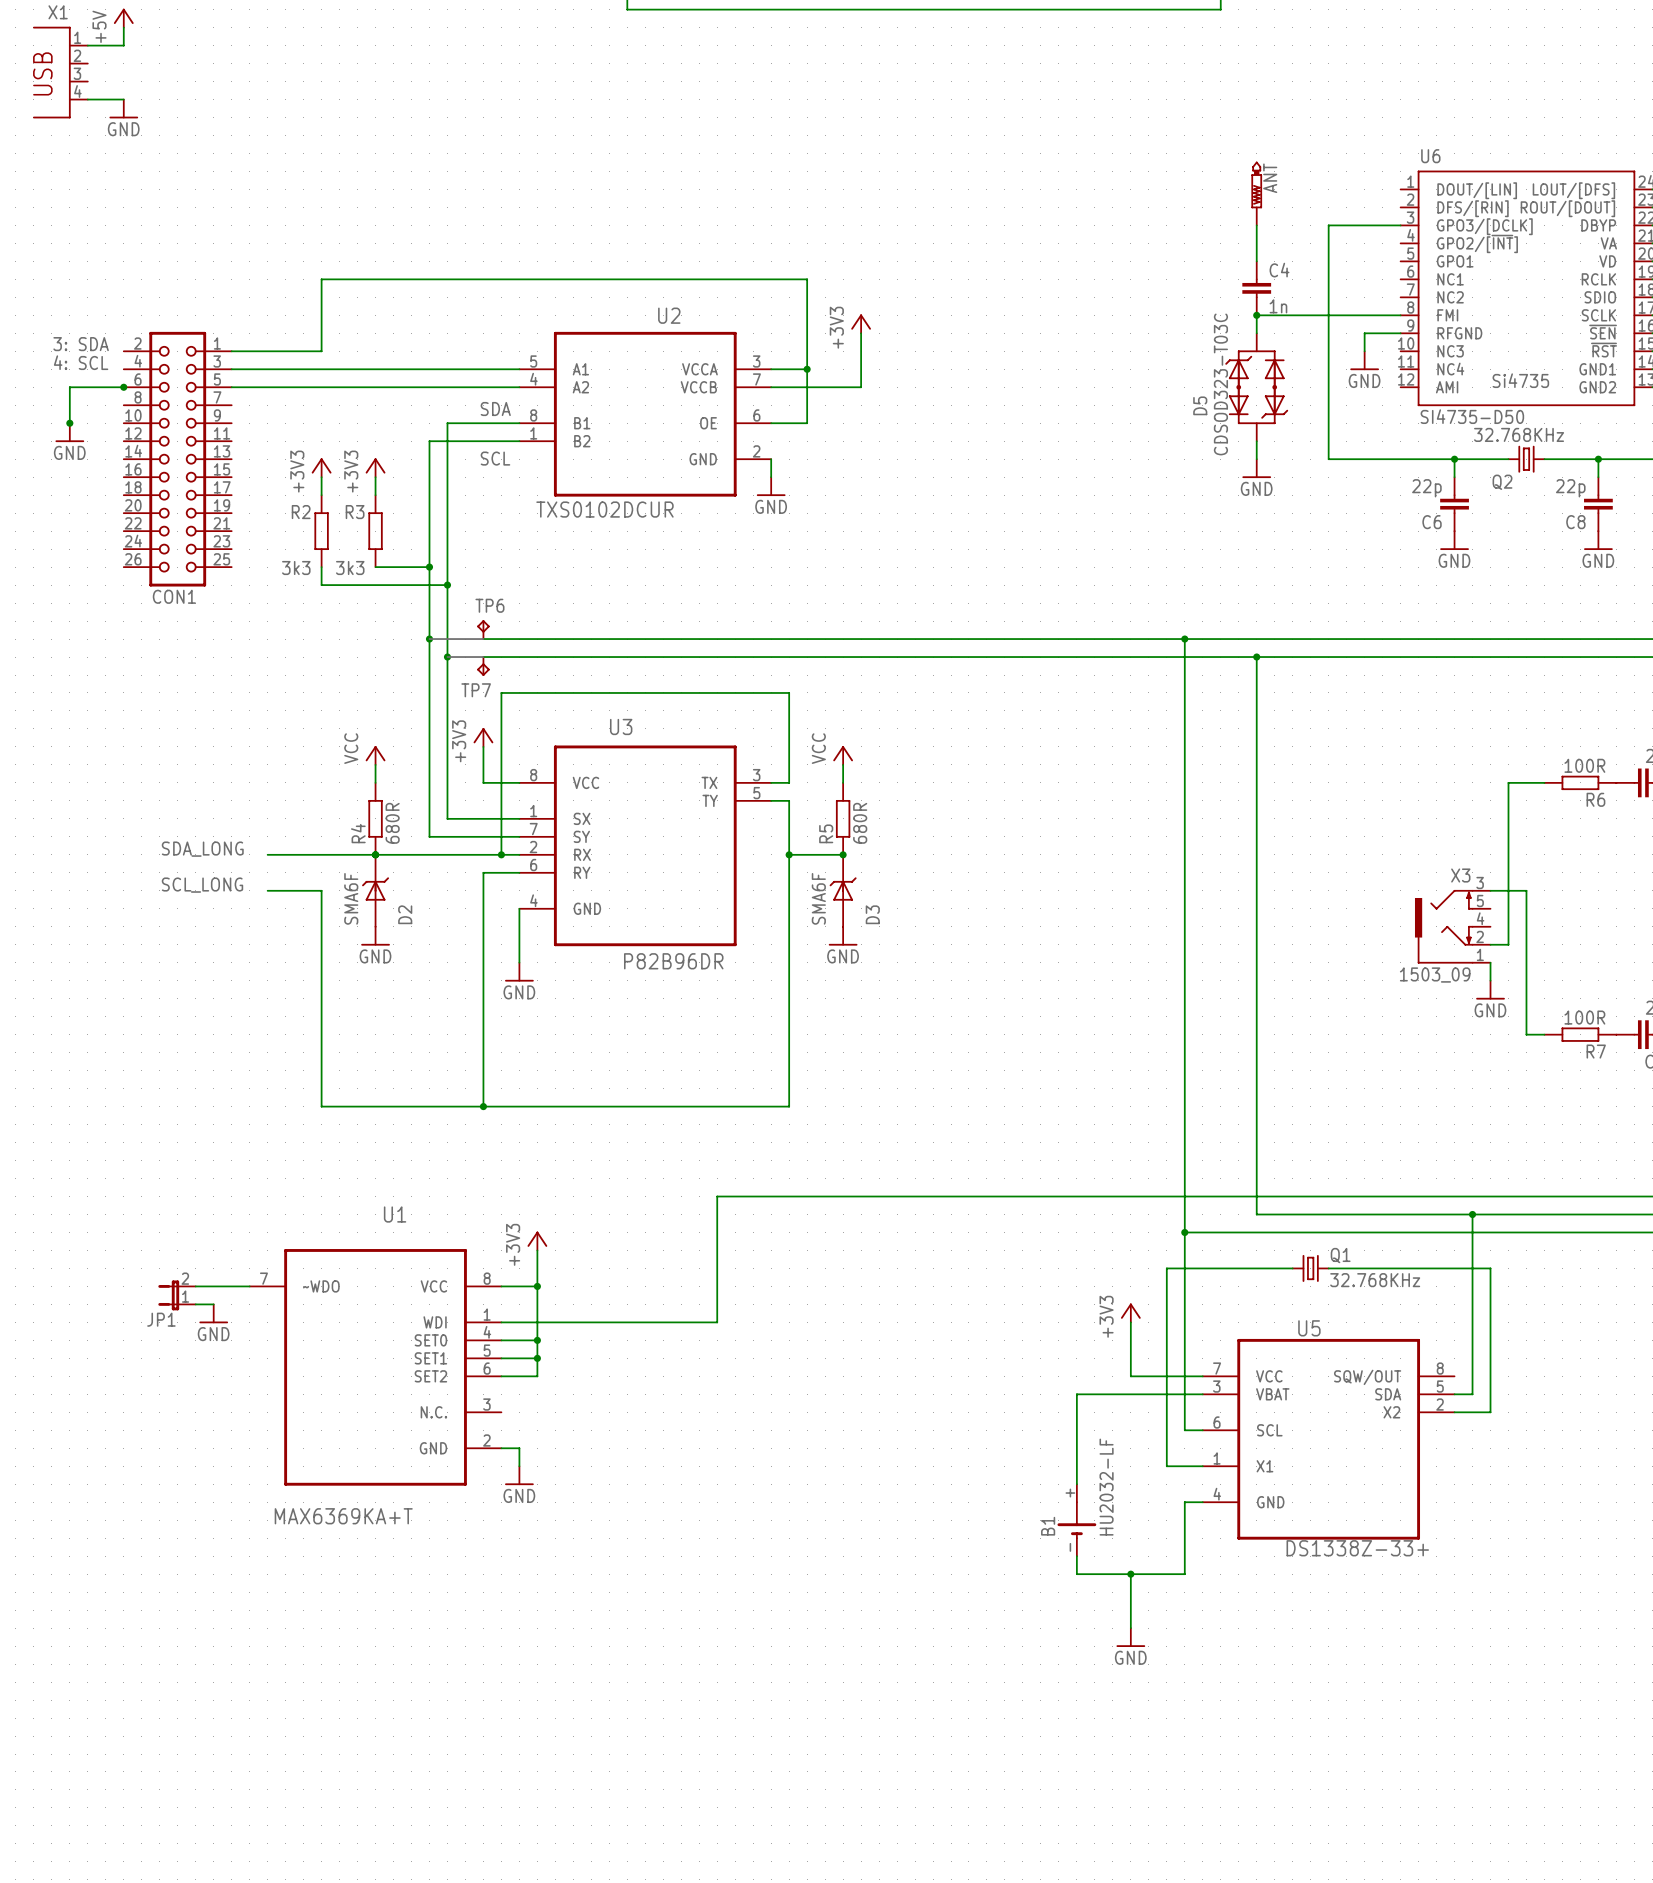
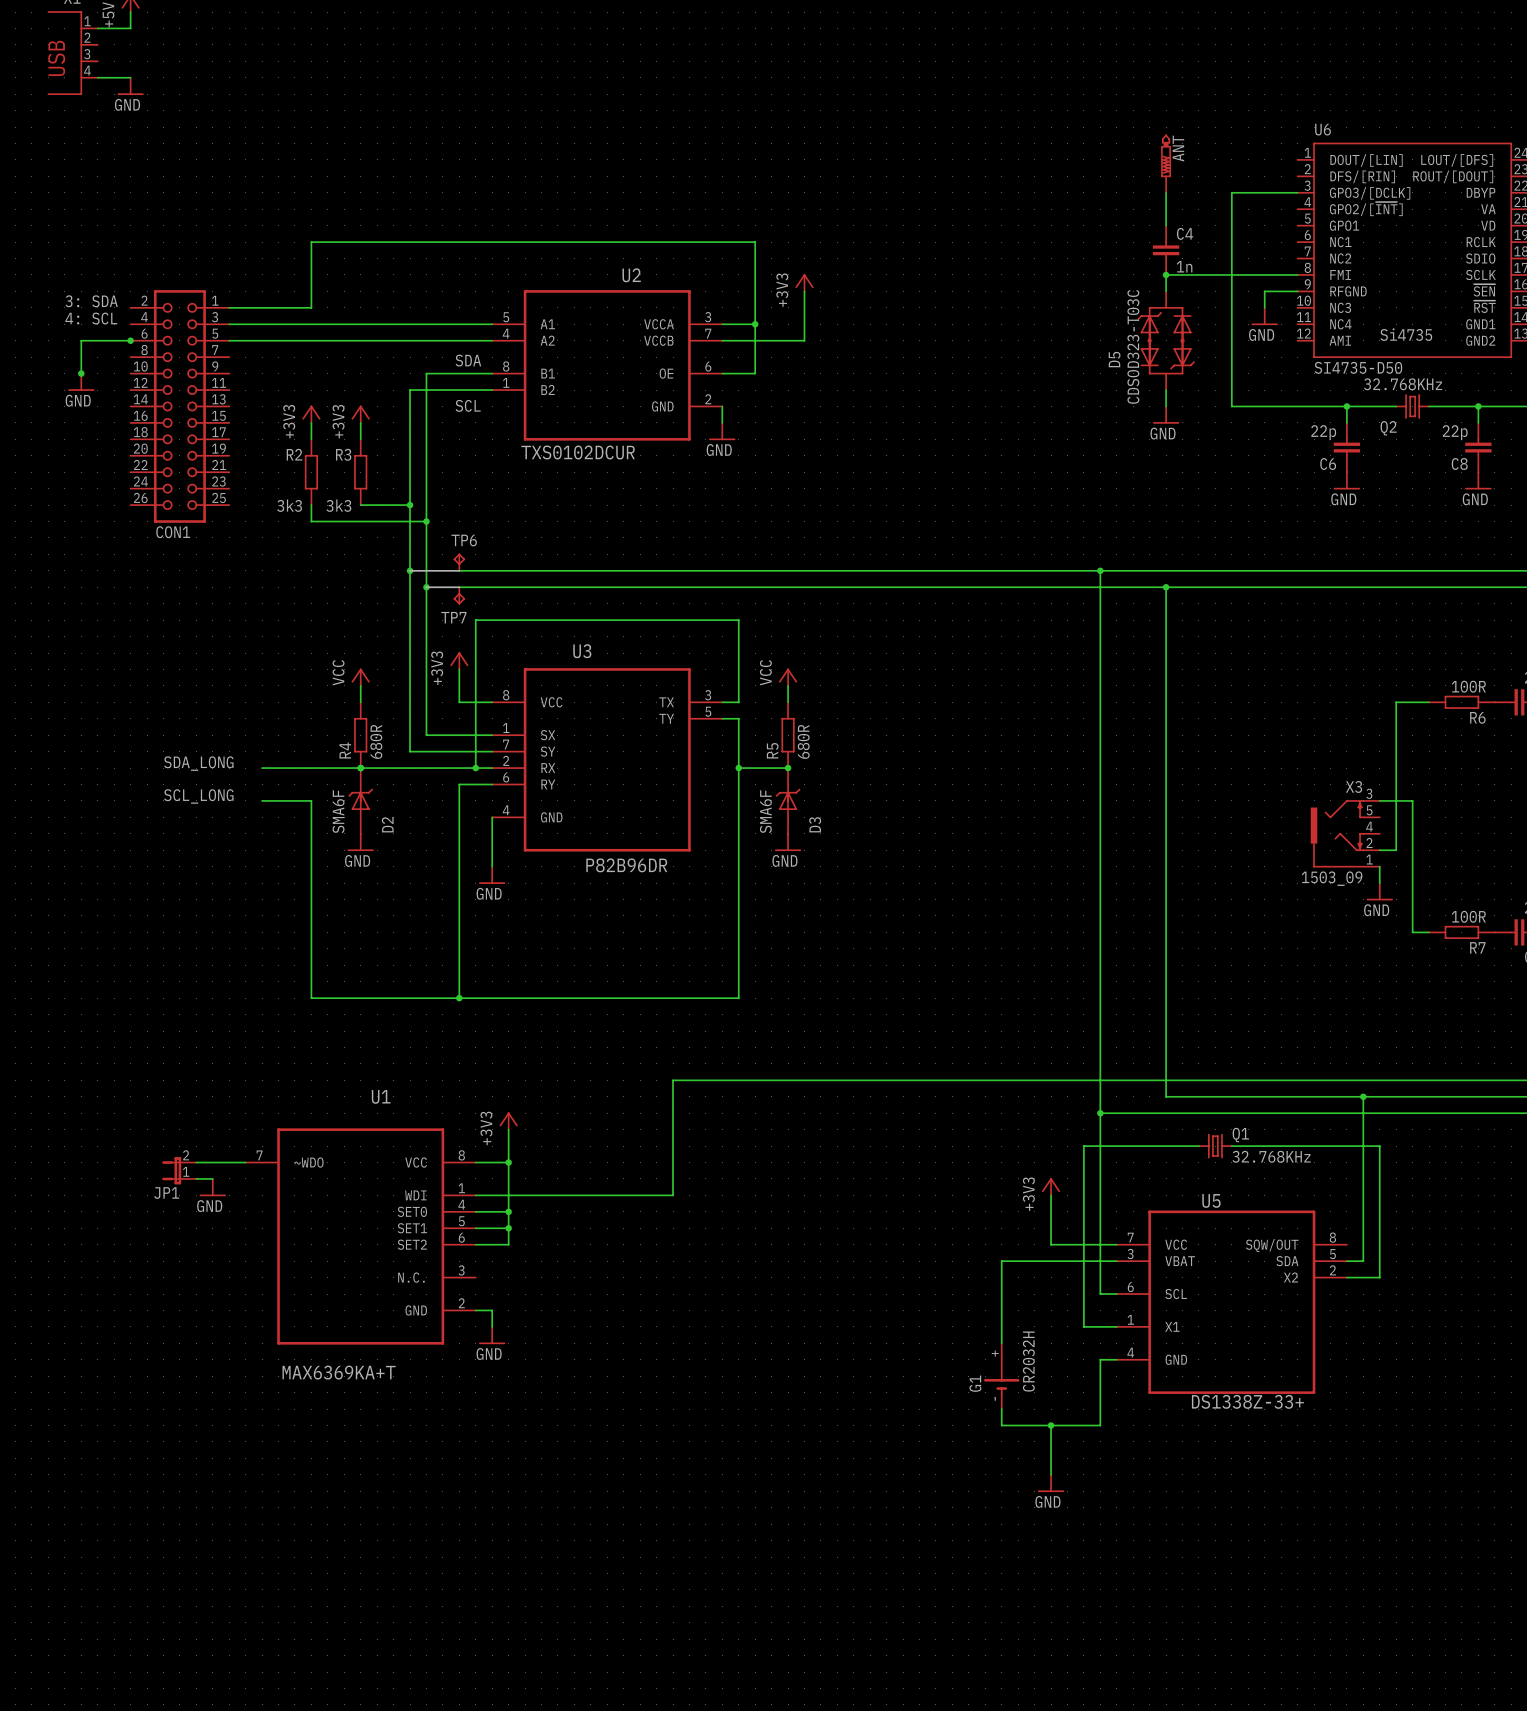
B1 value: HU2032-LF (1106, 1487) -> CR2032H (1028, 1361)
B1 name: B1 (1048, 1526) -> G1 (975, 1383)

